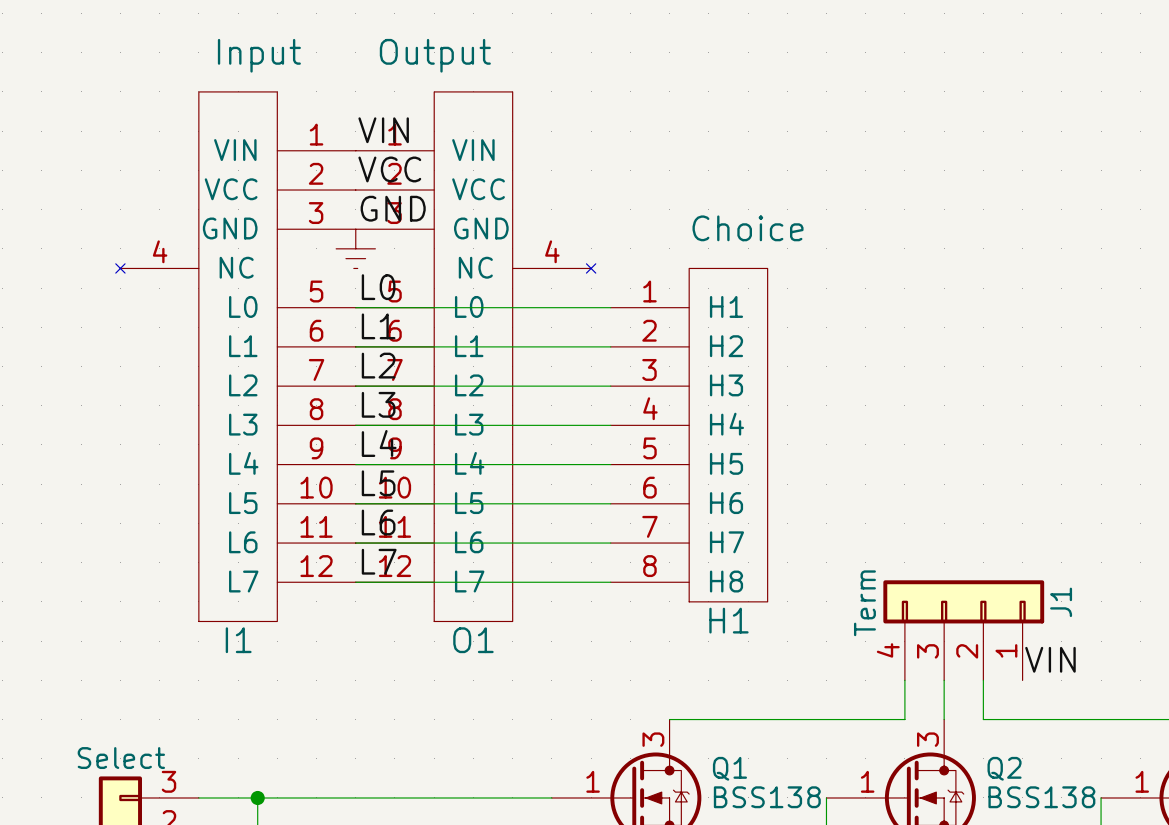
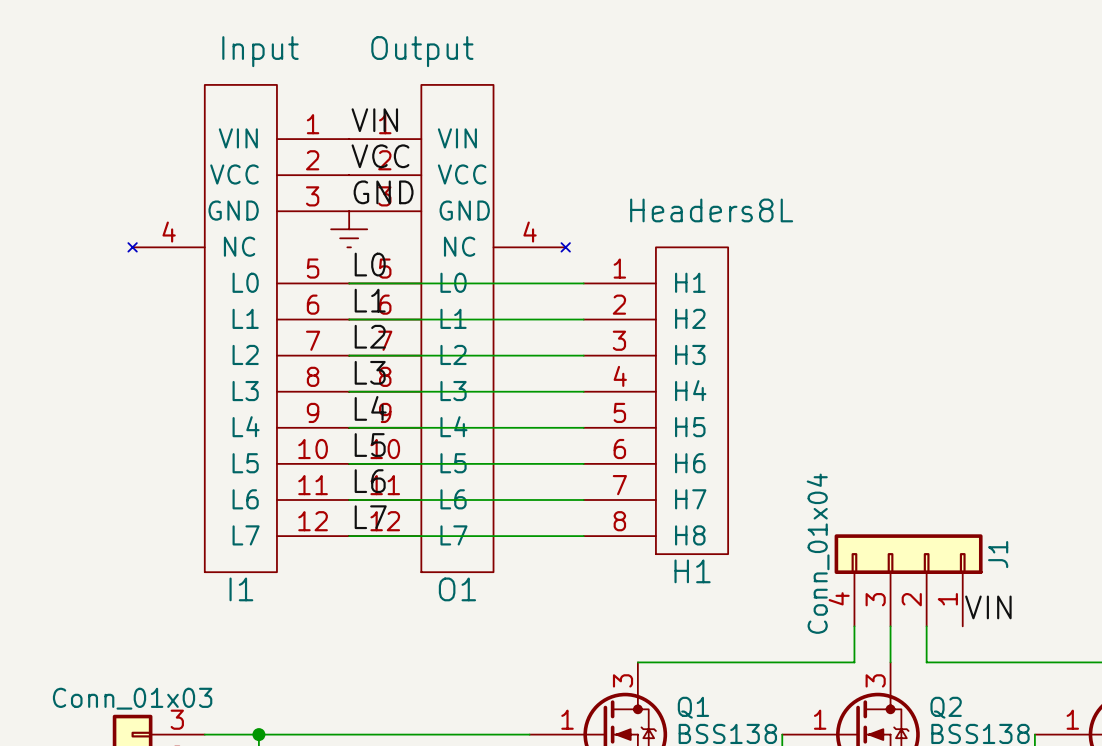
H1 value: Choice (748, 228) -> Headers8L (711, 210)
J1 value: Term (864, 603) -> Conn_01x04 (818, 553)
part value: Select (121, 758) -> Conn_01x03 (132, 698)

